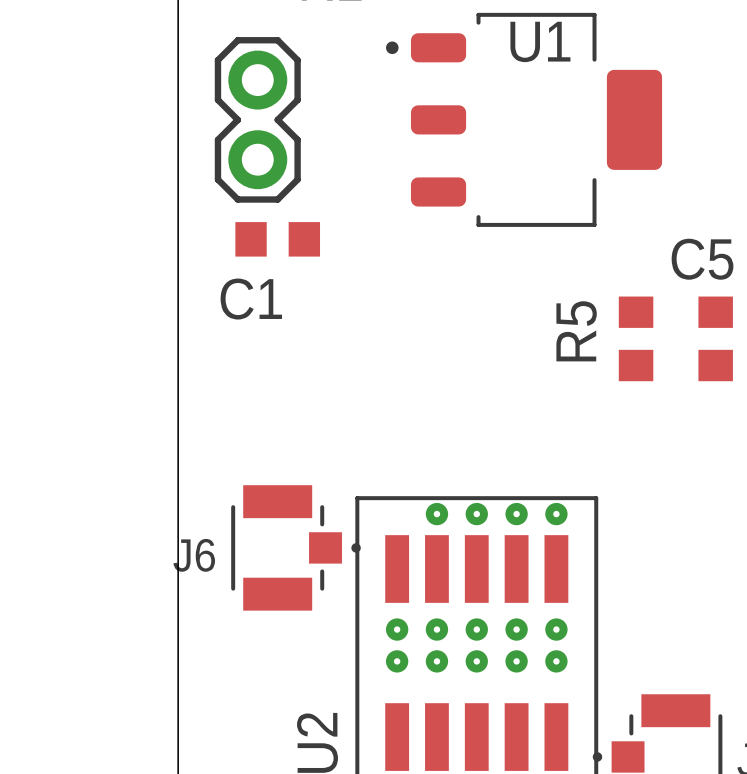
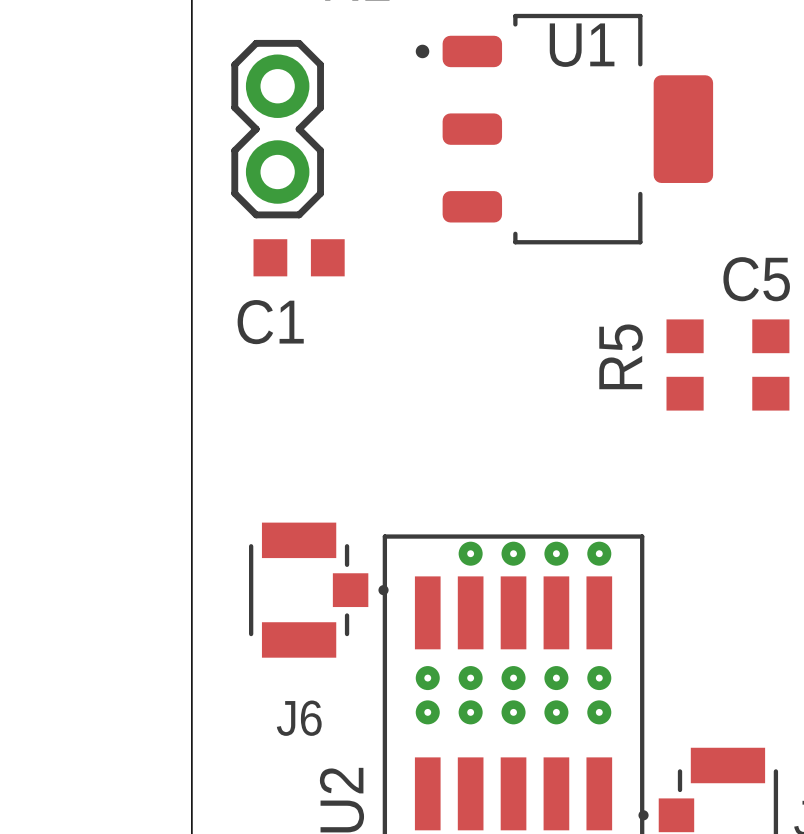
J6 name position: J6 (194, 555) -> J6 (299, 718)

